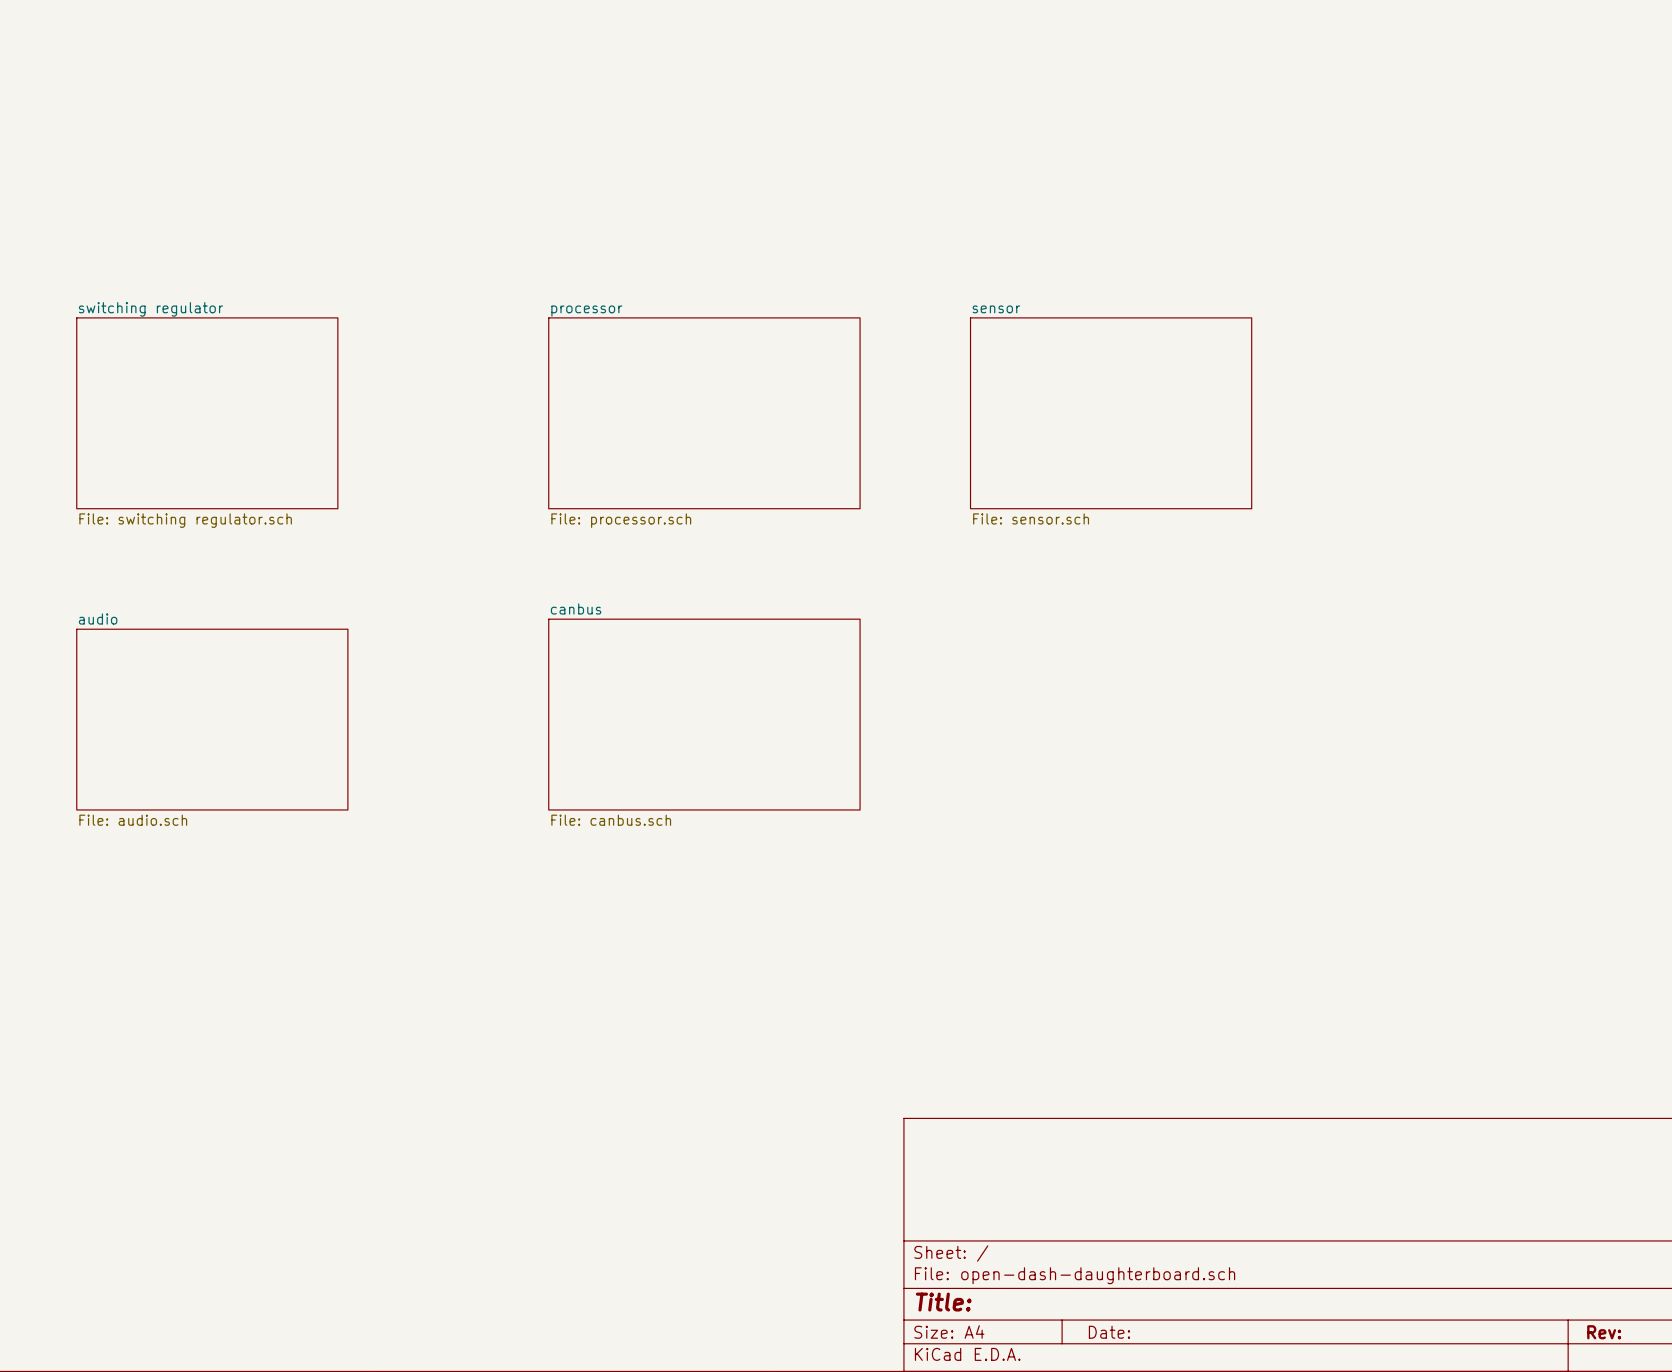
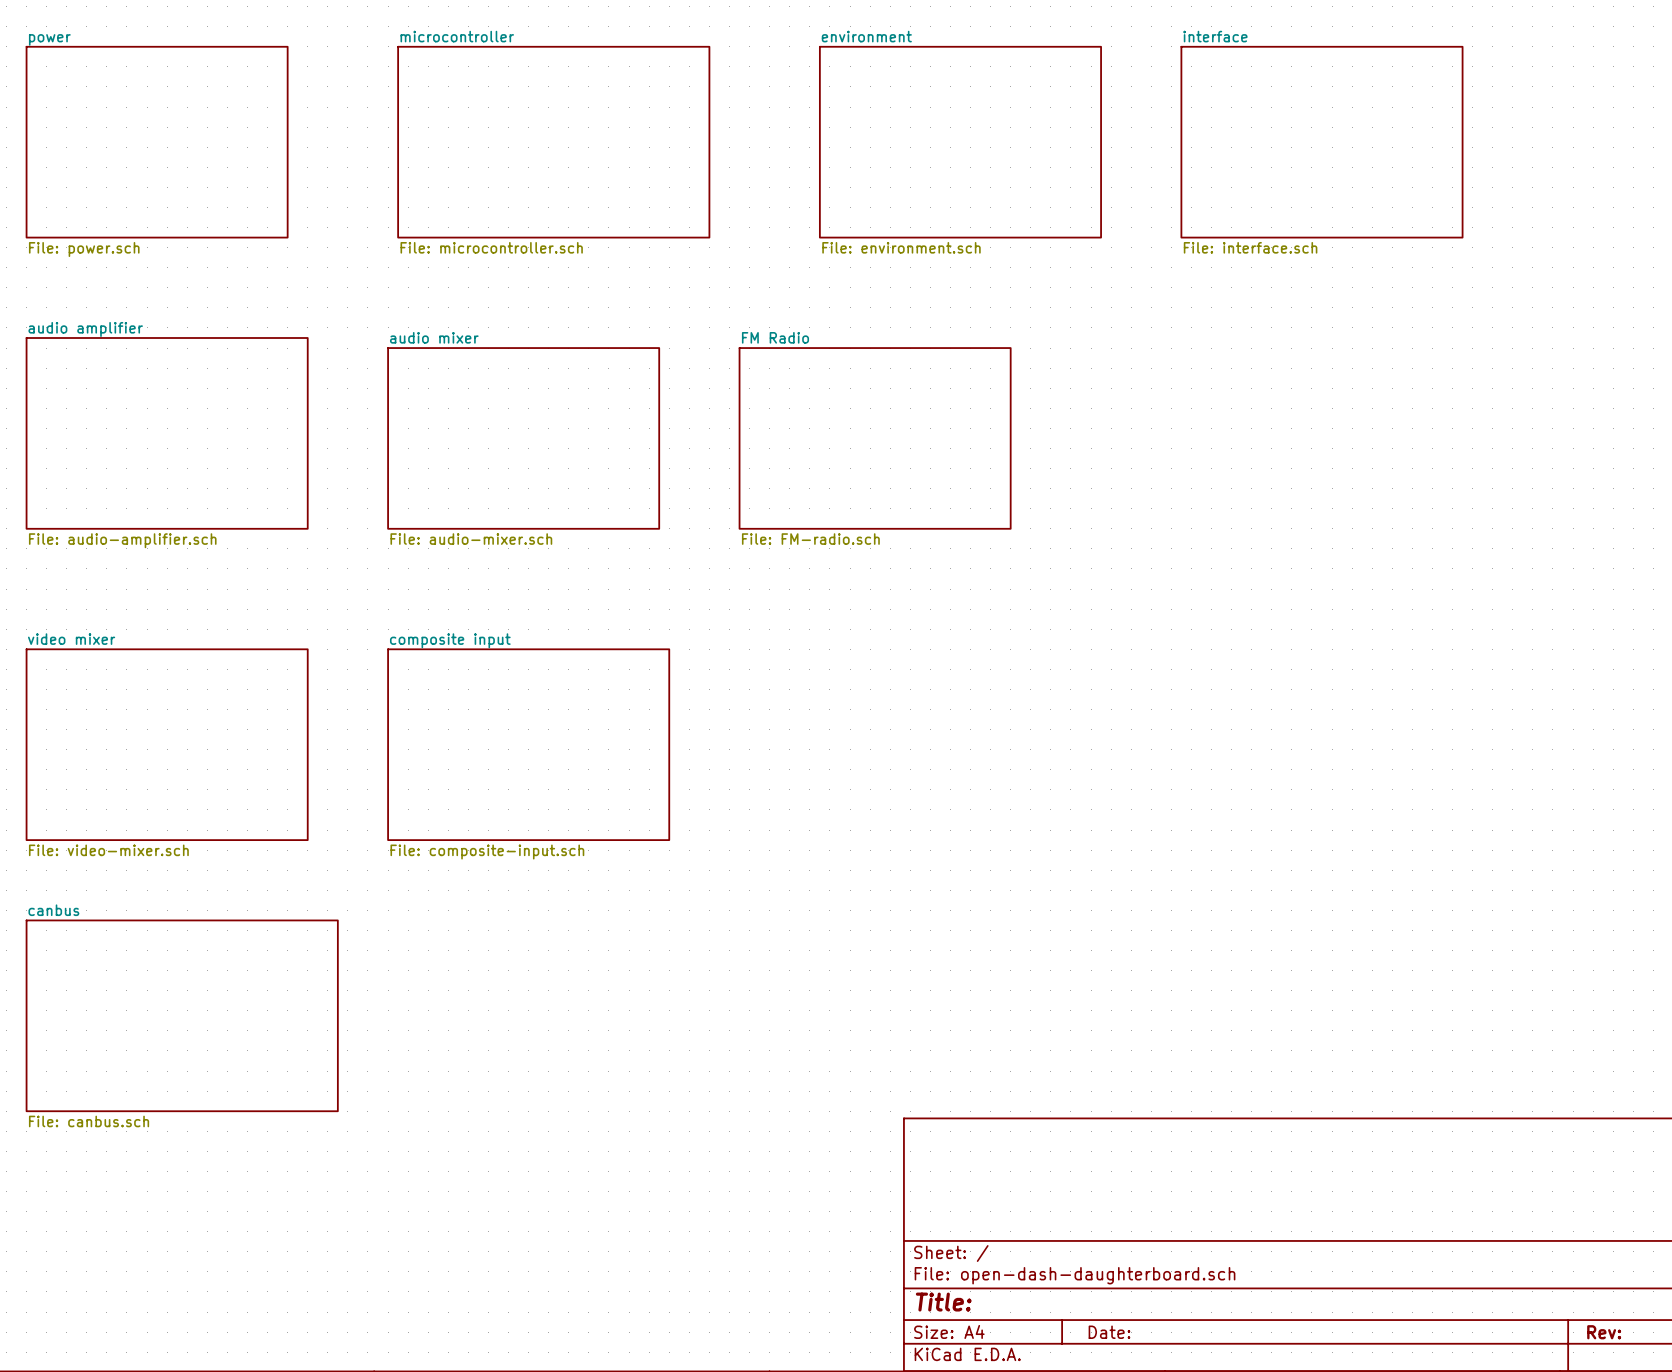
sheet power: none -> File: power.sch (157, 142)
sheet microcontroller: none -> File: microcontroller.sch (553, 142)
sheet environment: none -> File: environment.sch (960, 142)
sheet interface: none -> File: interface.sch (1321, 142)
sheet switching regulator: File: switching regulator.sch (207, 413) -> none
sheet processor: File: processor.sch (704, 413) -> none
sheet sensor: File: sensor.sch (1111, 413) -> none
sheet audio amplifier: none -> File: audio-amplifier.sch (167, 433)
sheet audio mixer: none -> File: audio-mixer.sch (523, 438)
sheet FM Radio: none -> File: FM-radio.sch (875, 438)
sheet canbus: File: canbus.sch (704, 714) -> none
sheet audio: File: audio.sch (212, 719) -> none
sheet video mixer: none -> File: video-mixer.sch (167, 744)
sheet composite input: none -> File: composite-input.sch (528, 744)
sheet canbus: none -> File: canbus.sch (182, 1015)

